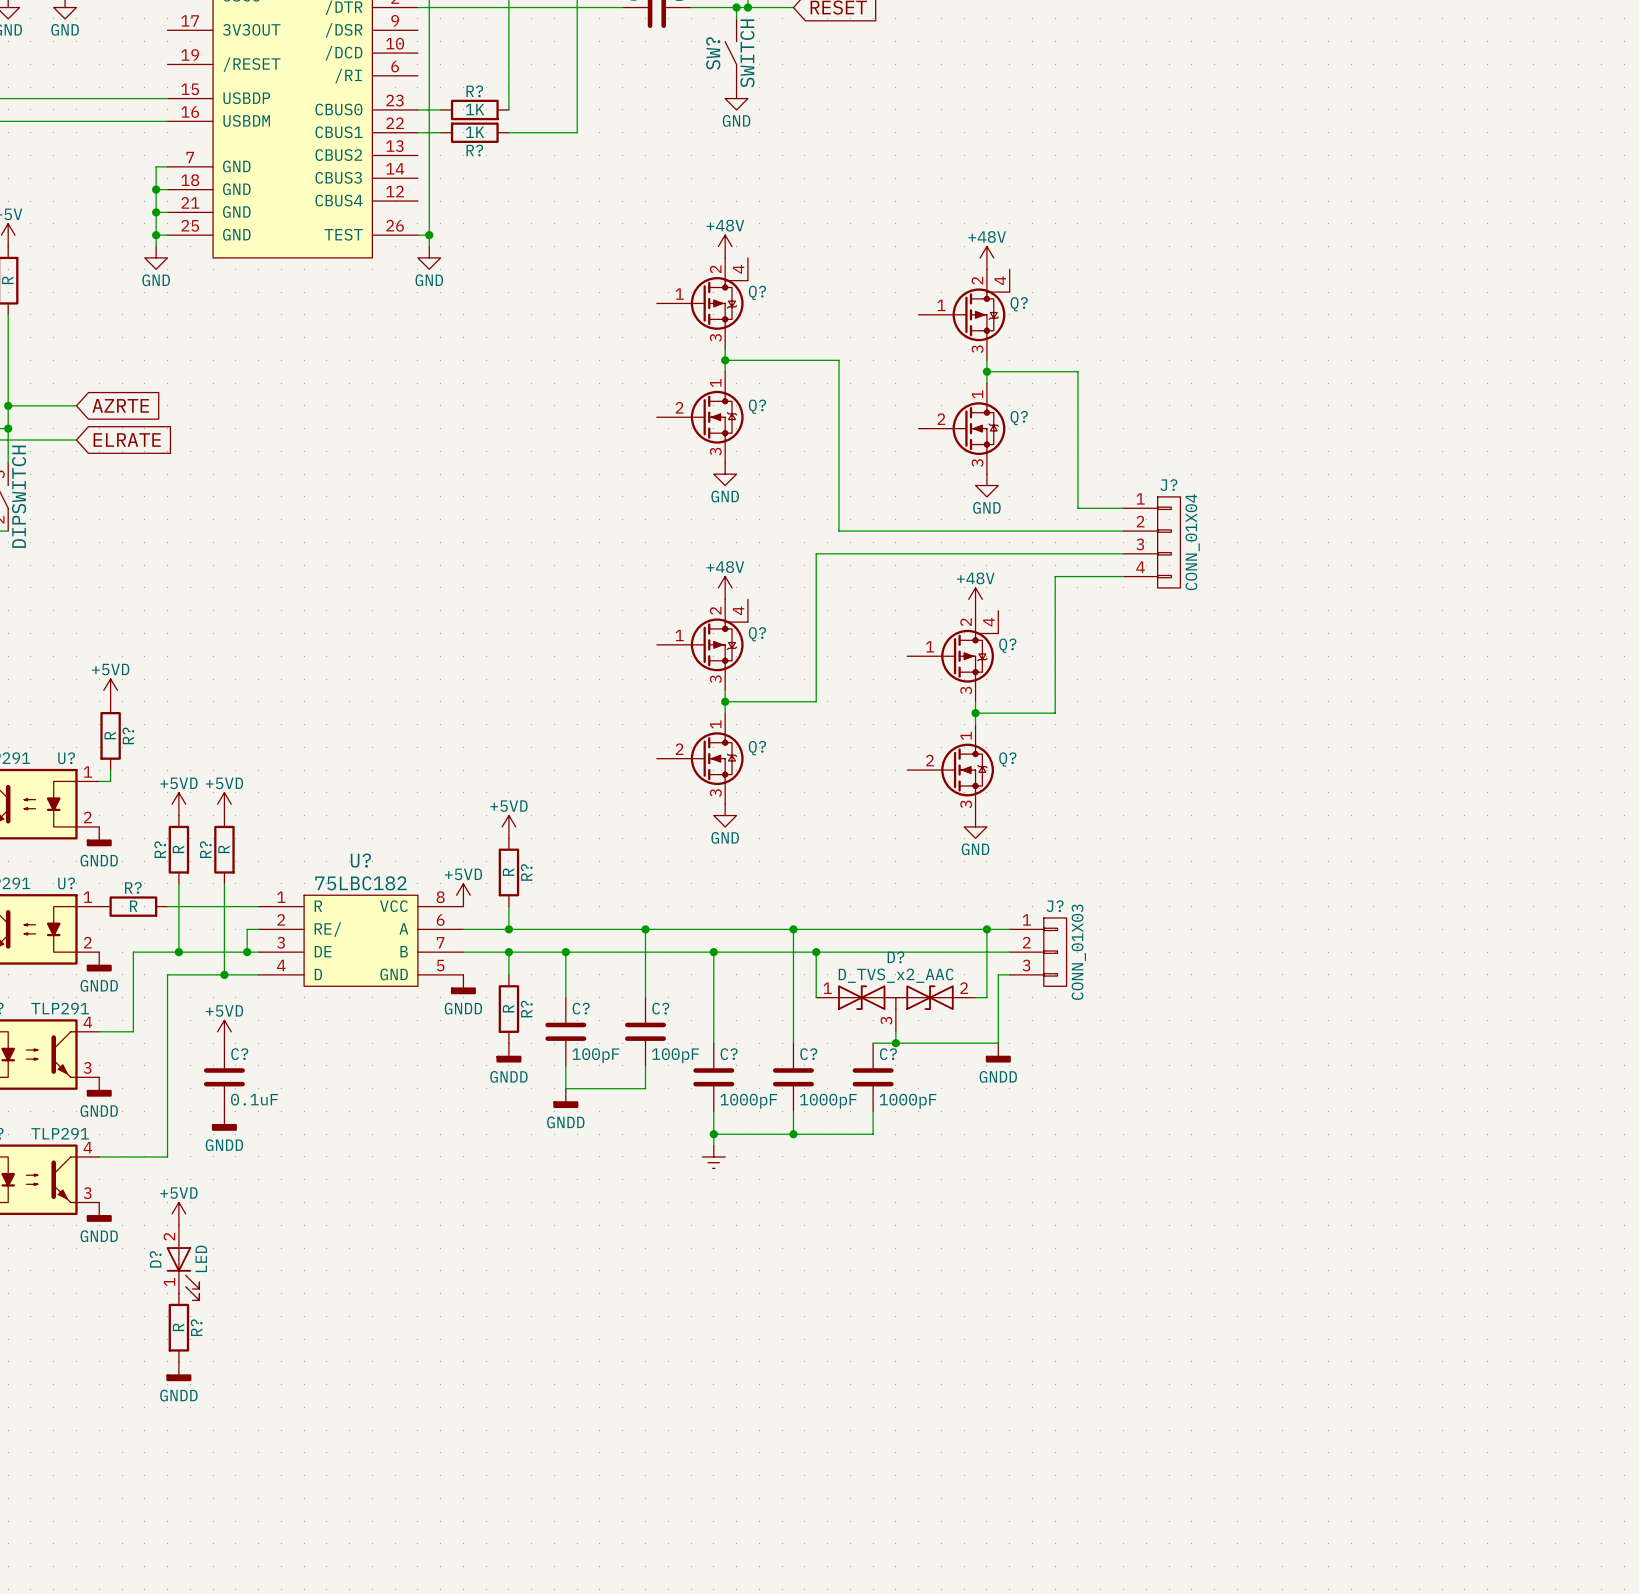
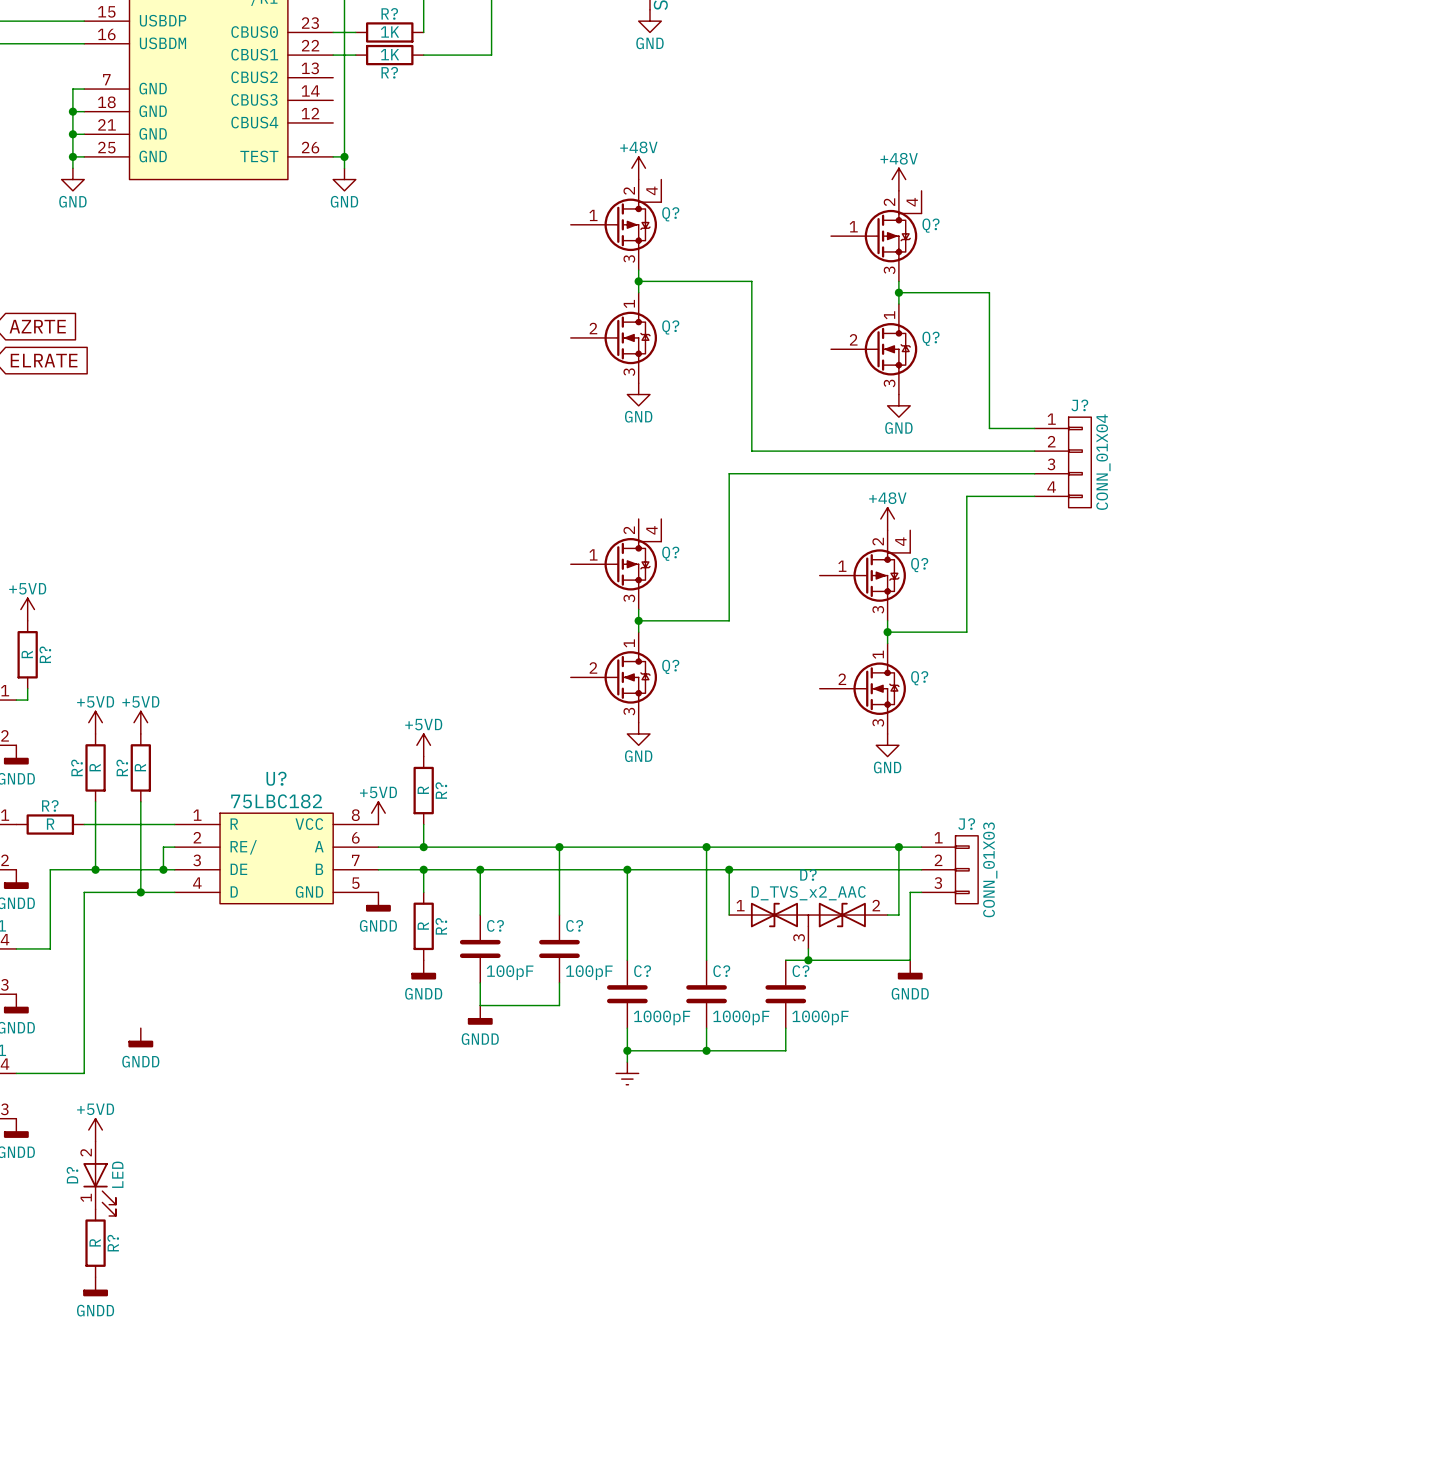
power symbol: +48V (725, 587) -> none
power symbol: +5VD (224, 1031) -> none
C?: 0.1uF (224, 1077) -> none

